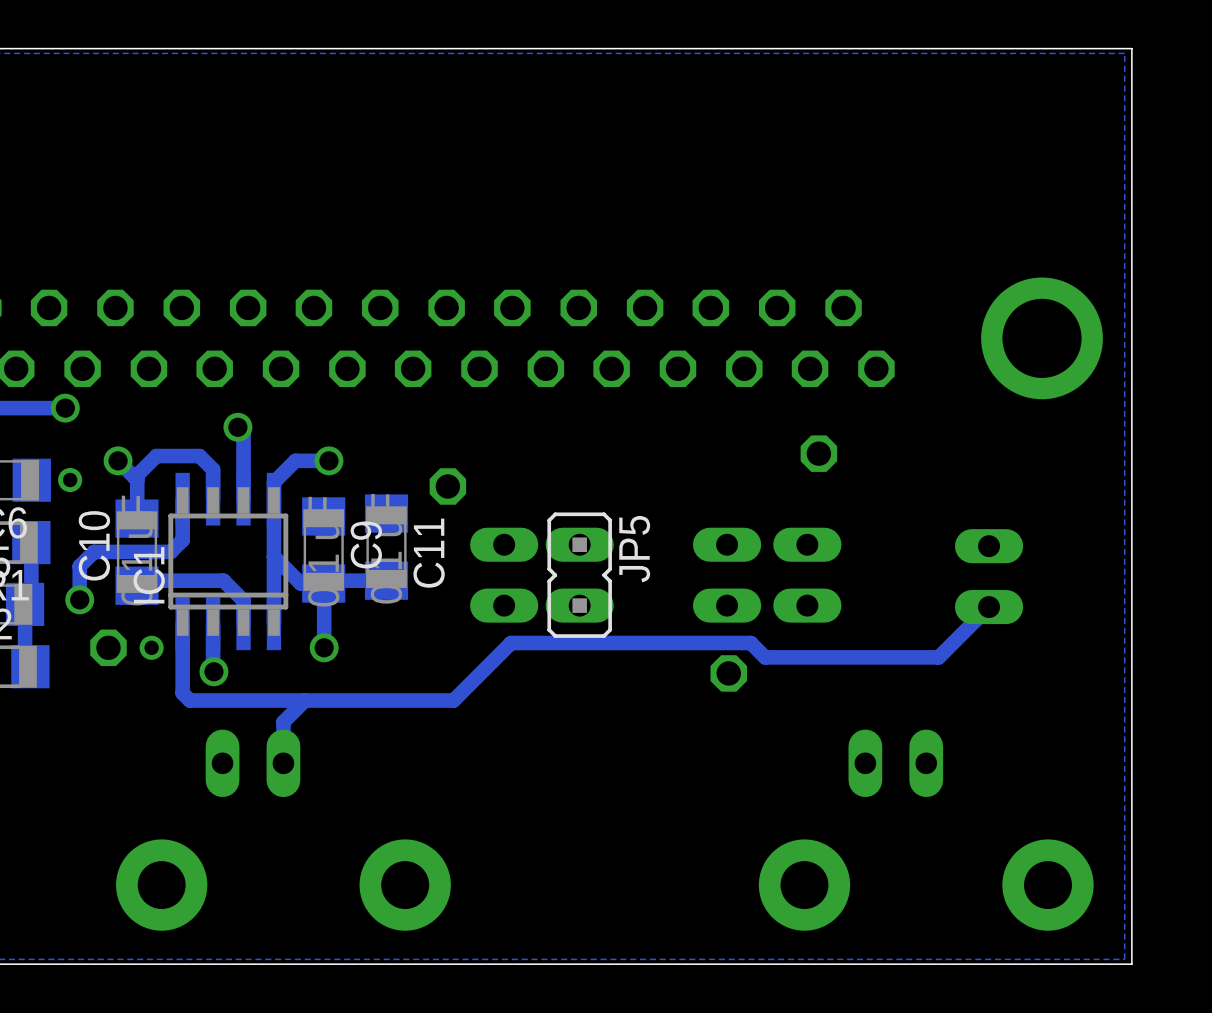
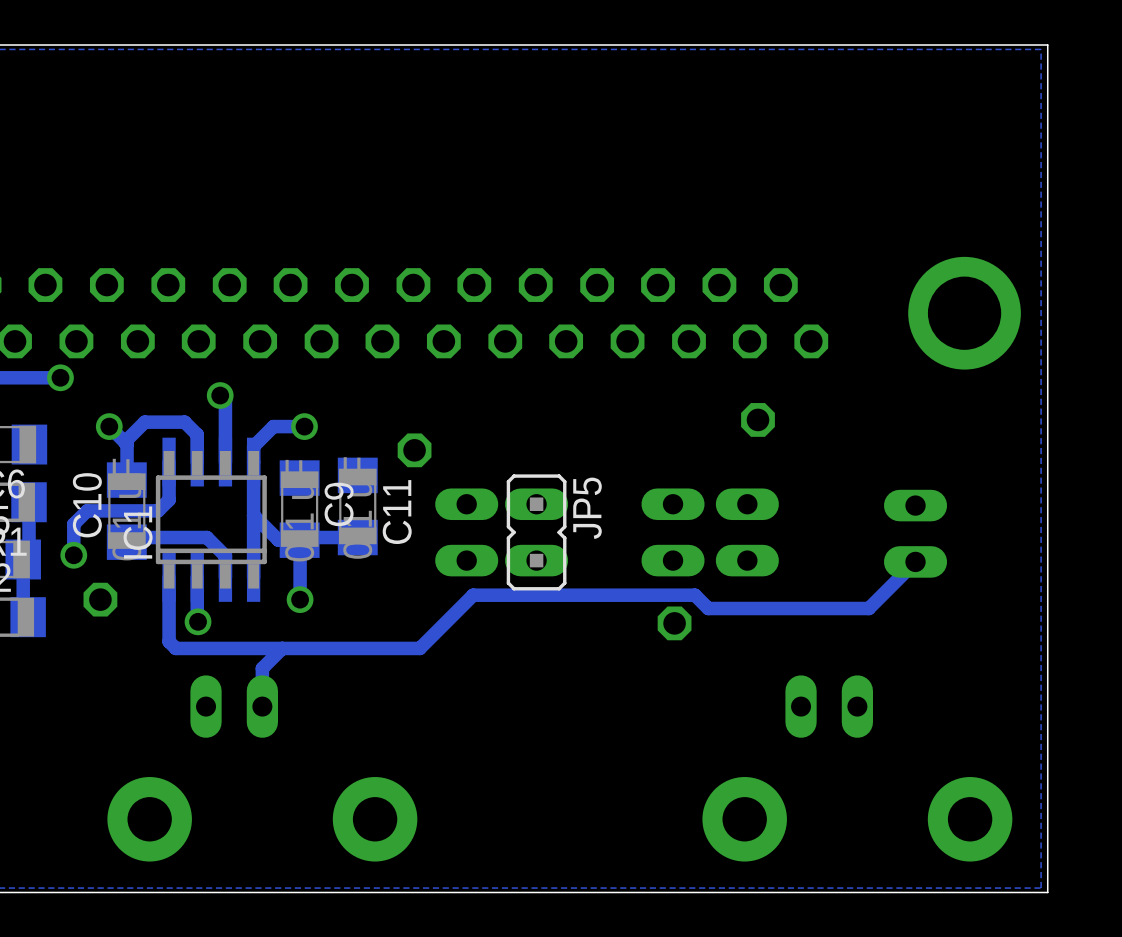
via: (70, 480) -> none
via: (151, 647) -> none

